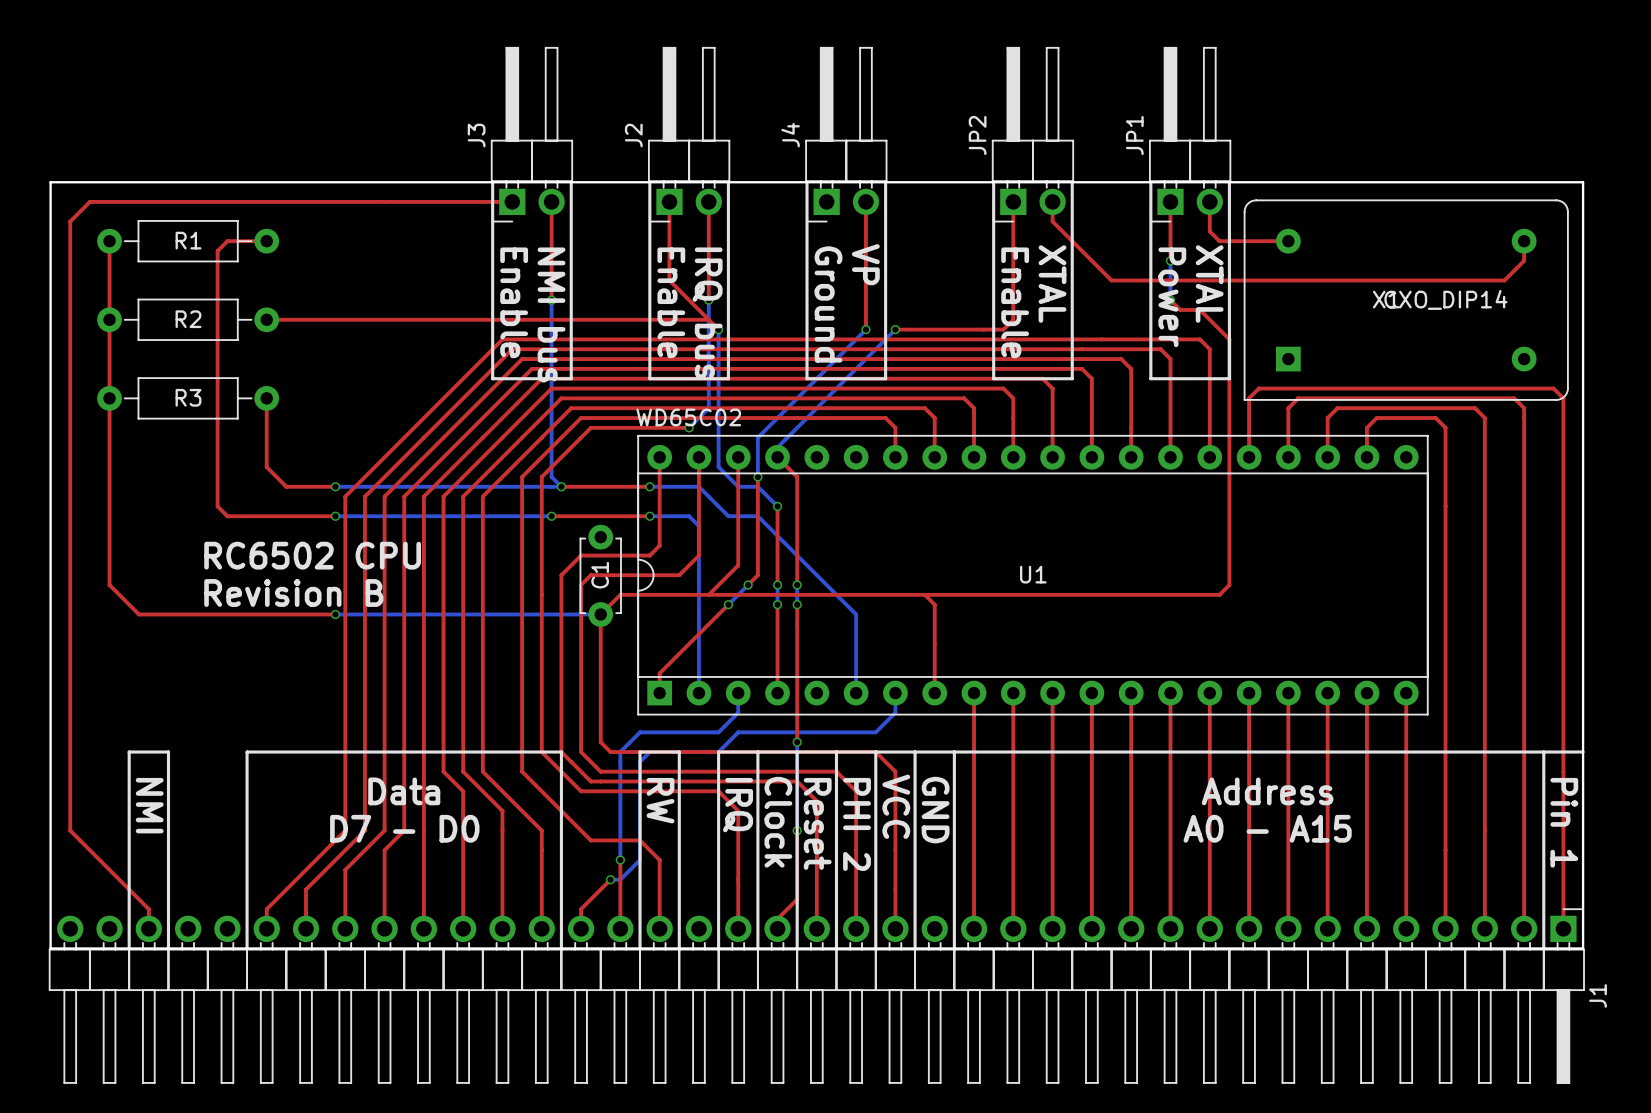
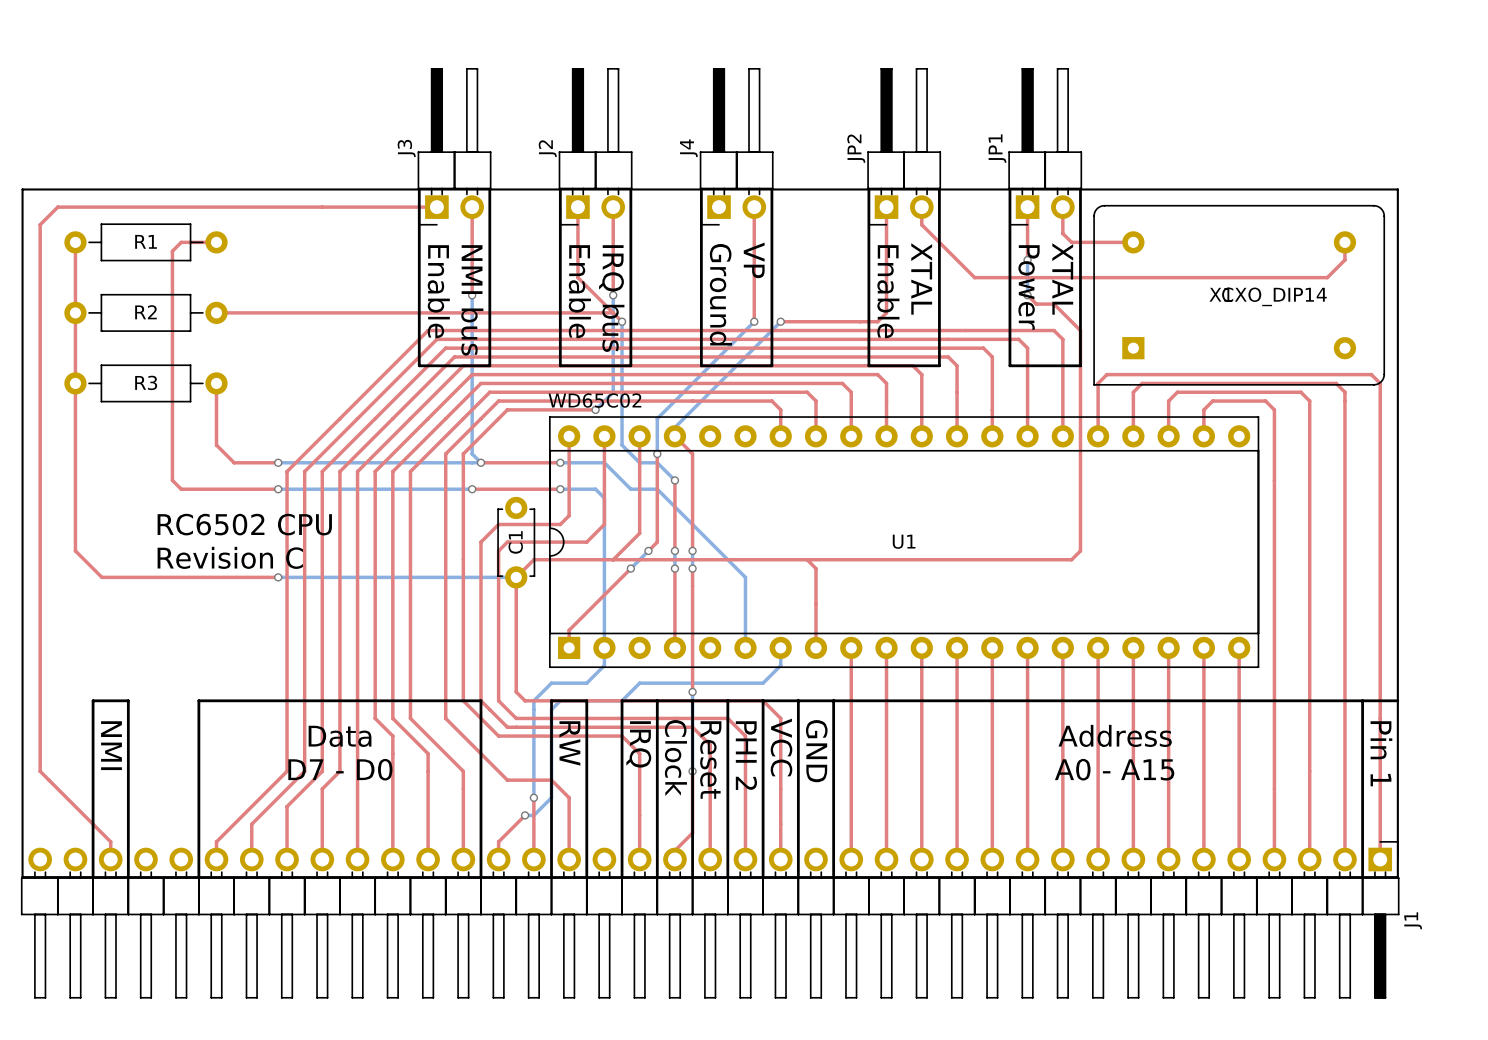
text: Revision B (293, 593) -> Revision C (230, 557)
bottom track: (738, 693) (738, 712) (718, 732) (679, 732) -> (604, 647) (604, 665) (586, 683)

